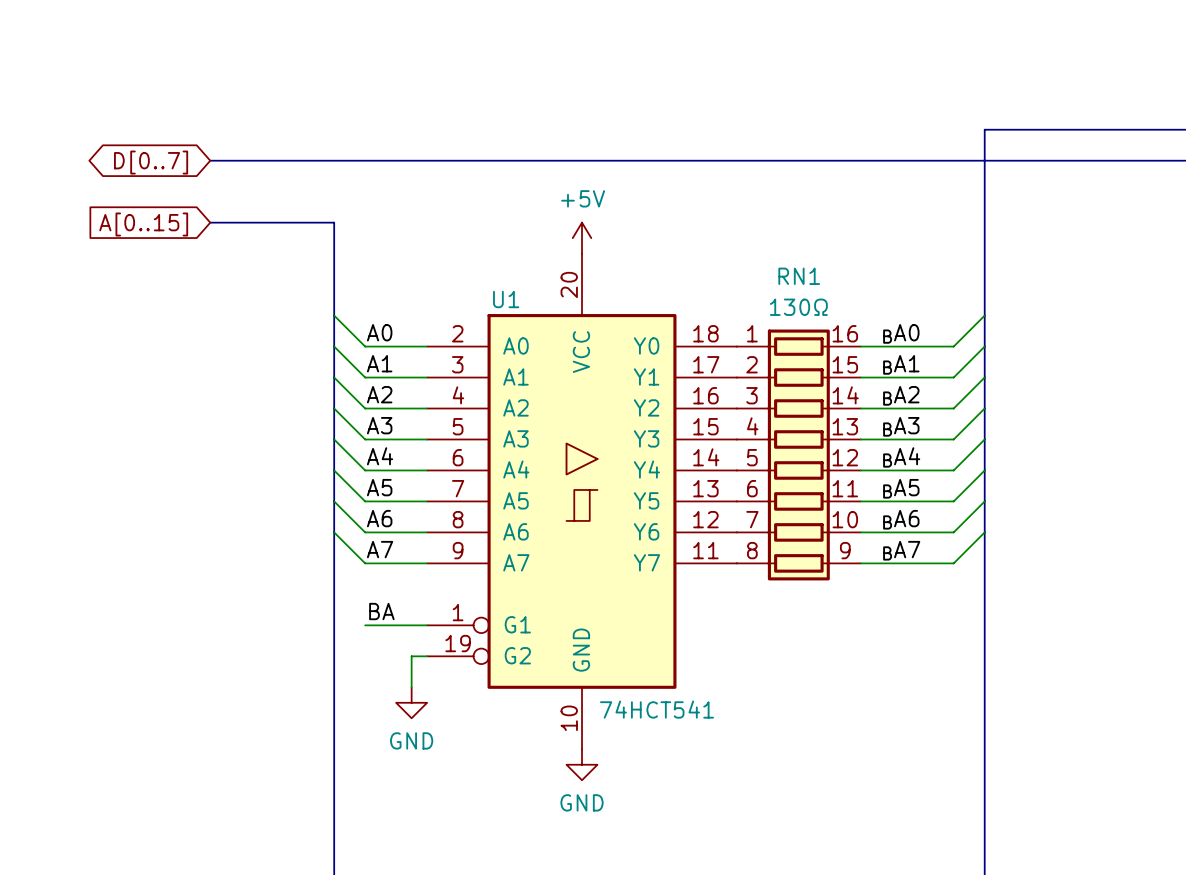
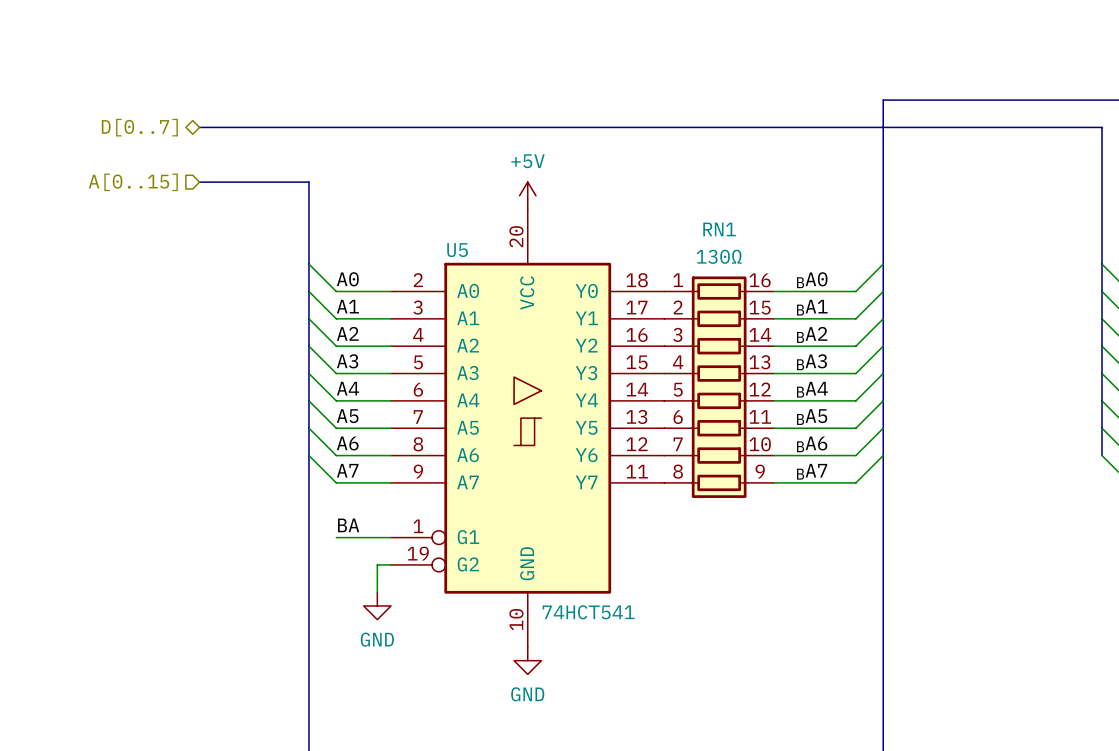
hierarchical label: none -> D[0..7] (139, 127)
global label: D[0..7] (151, 162) -> none
hierarchical label: none -> A[0..15] (133, 182)
global label: A[0..15] (143, 224) -> none
U1 name: U1 (506, 299) -> U5 (457, 250)

